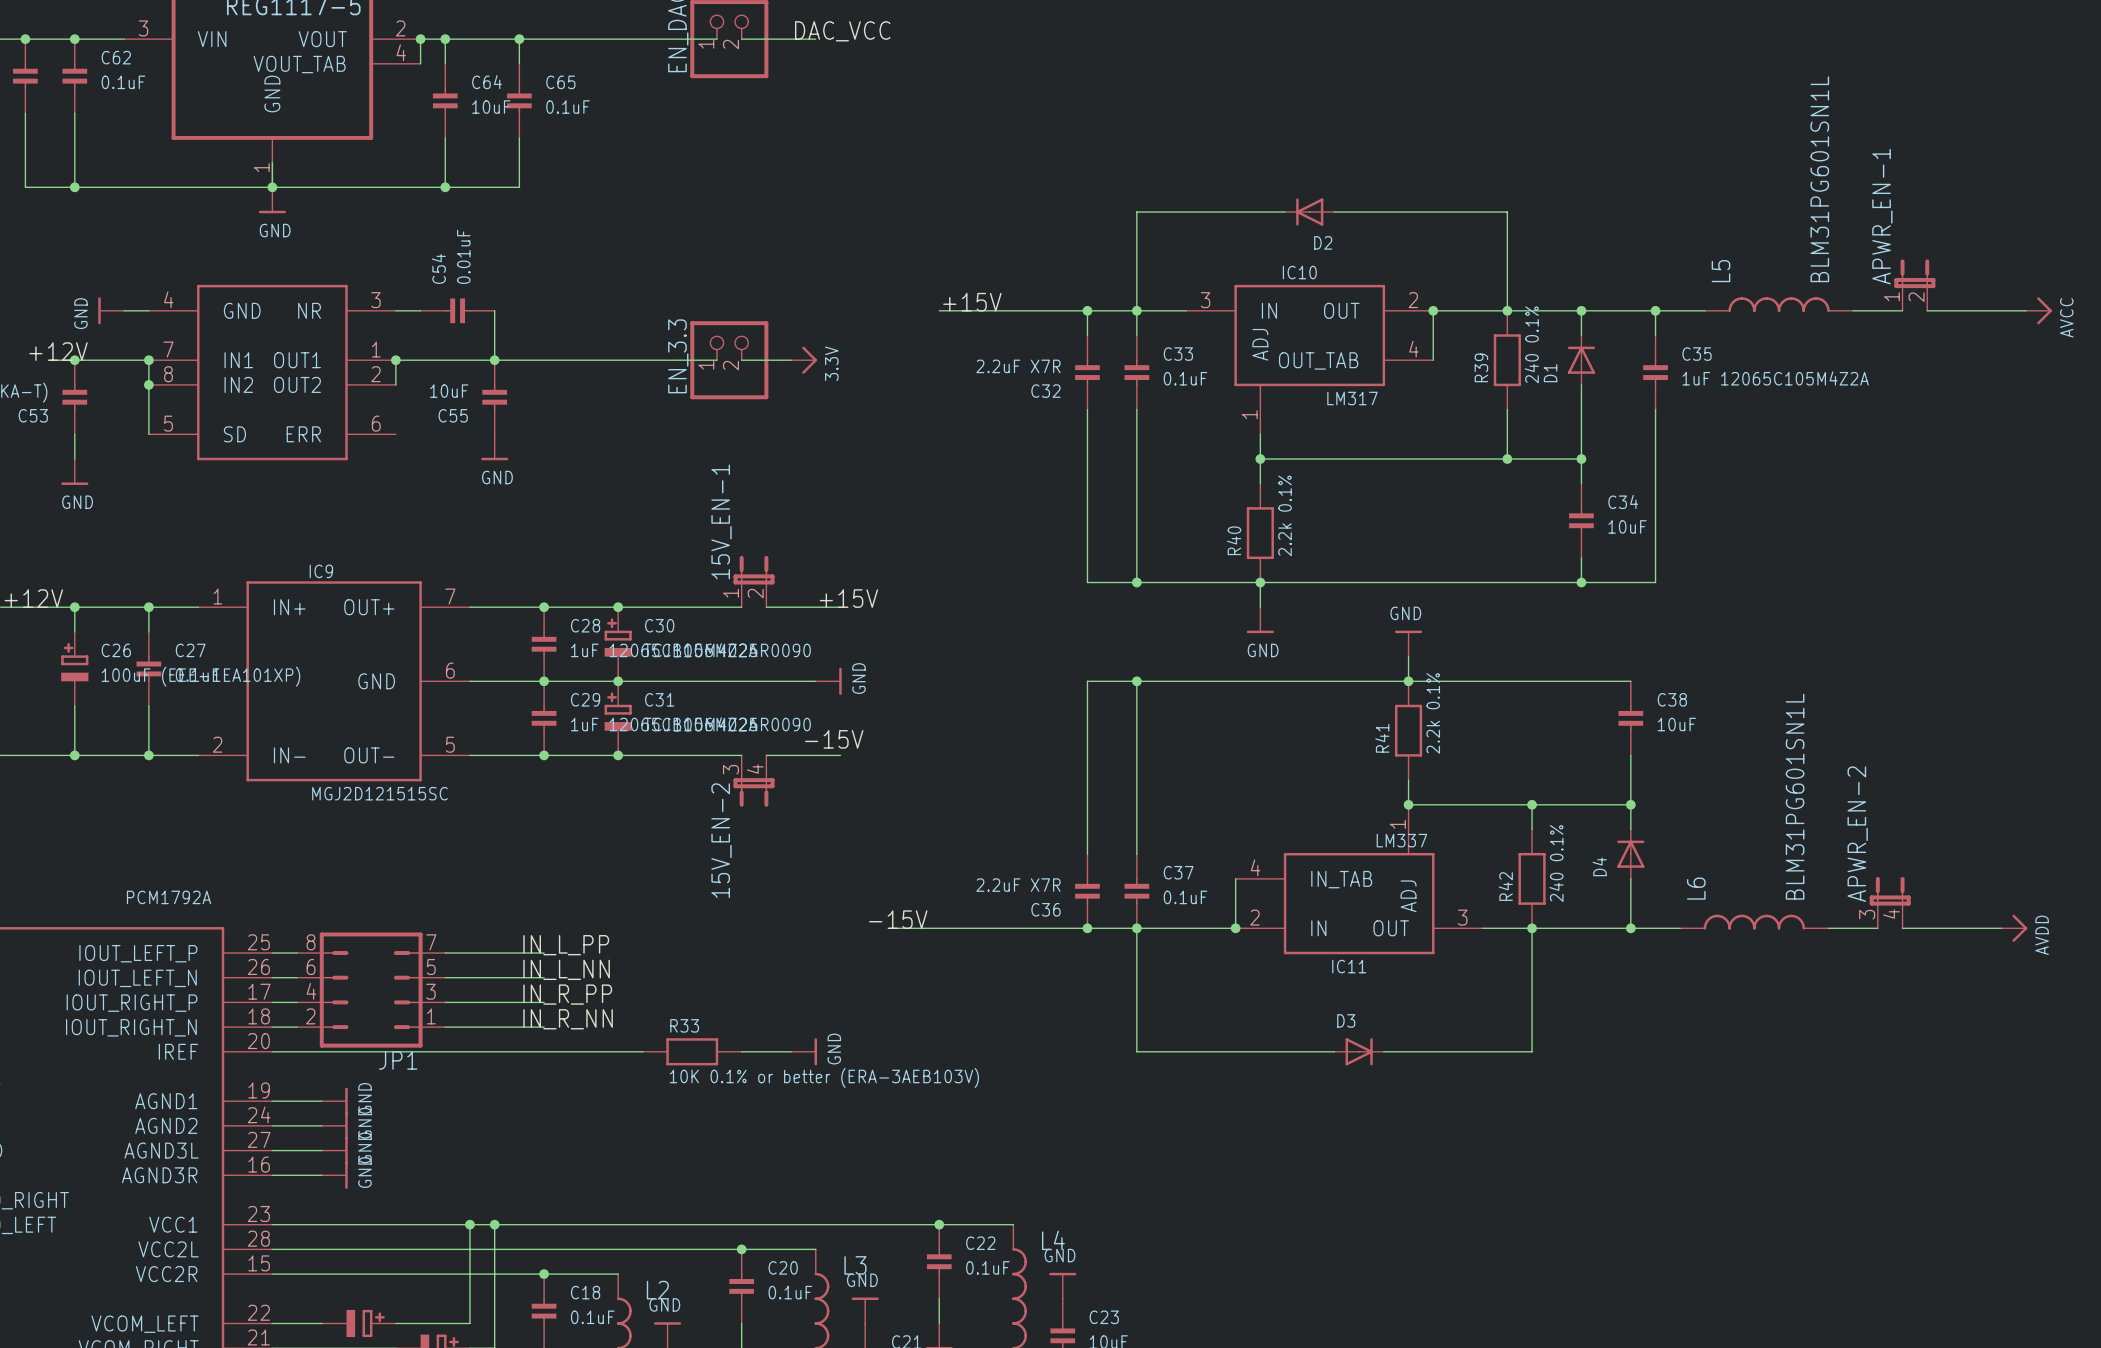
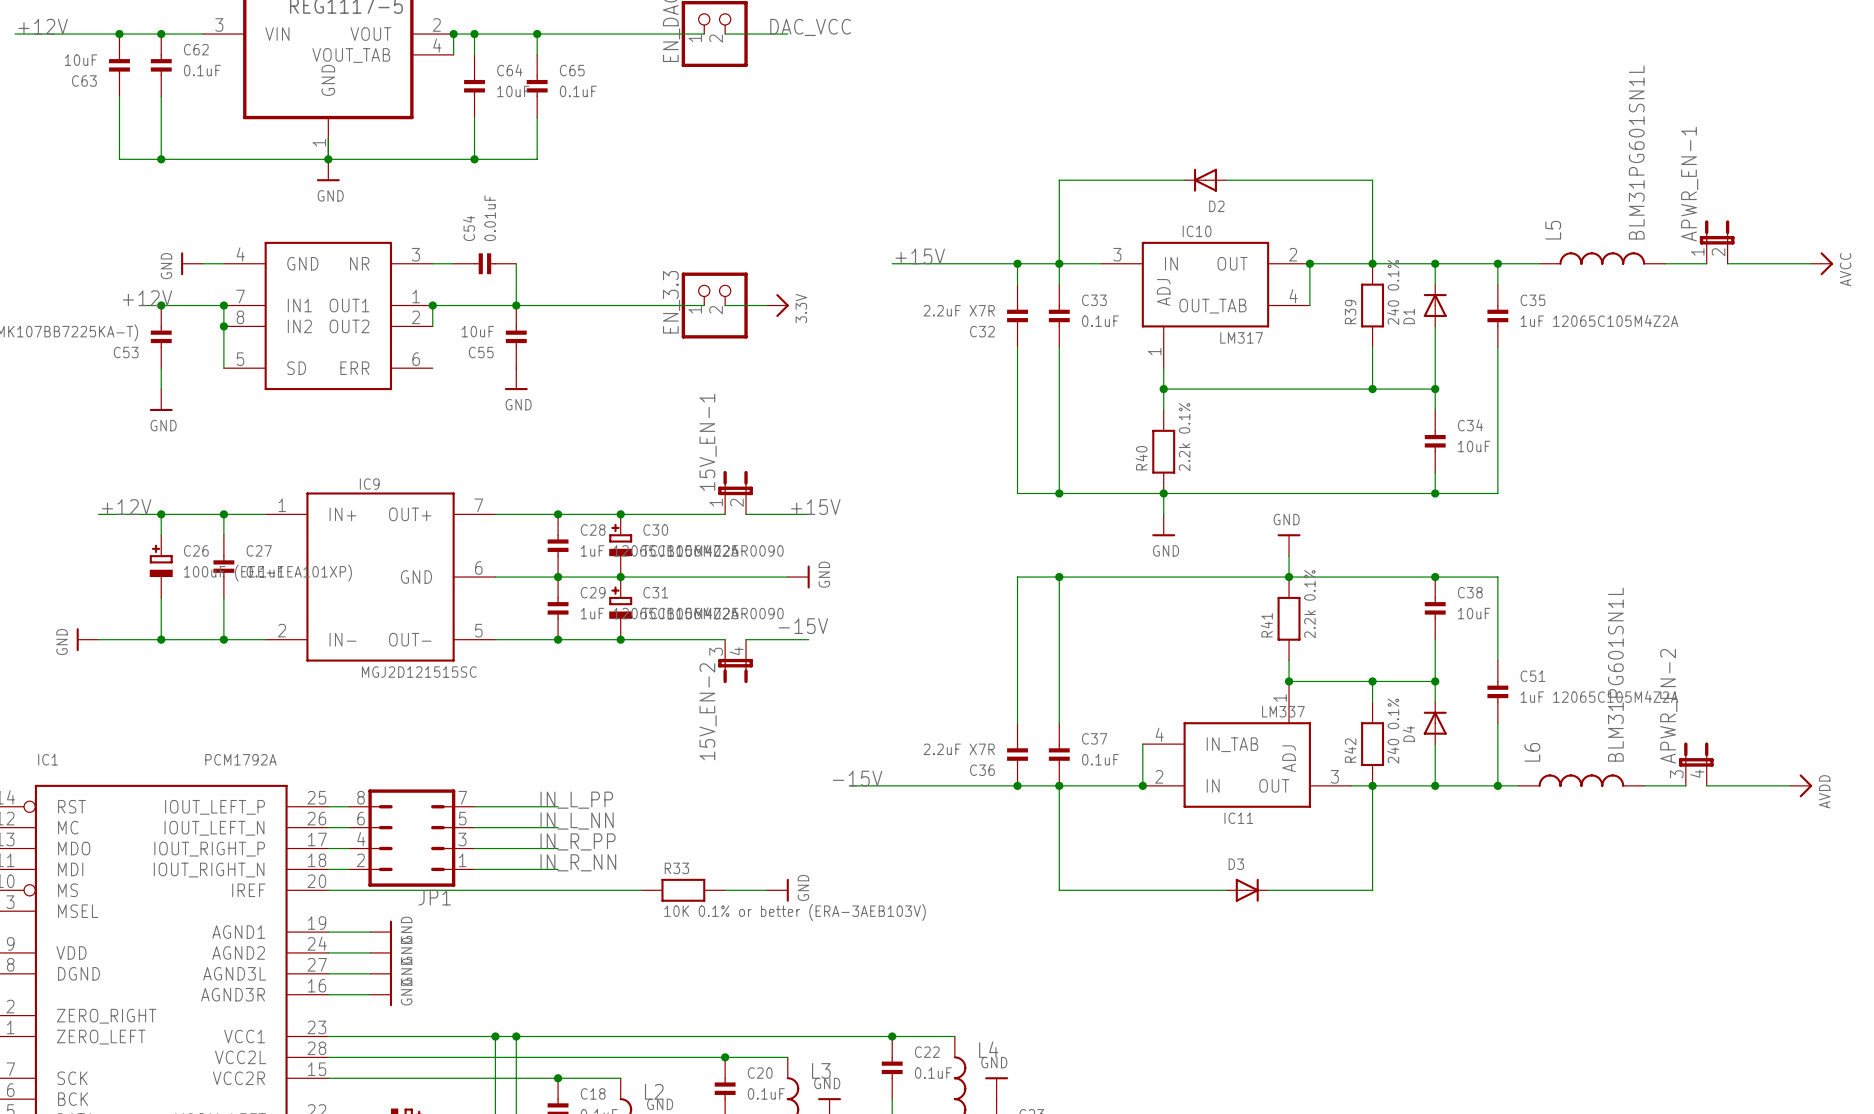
junction: none -> (1435, 577)
wire: none -> (1476, 577) (1497, 577) (1497, 660)
C38 position: (1630, 718) -> (1435, 608)
wire: (1630, 755) (1630, 829) -> (1435, 639) (1435, 702)
junction: none -> (1372, 681)
wire: (1532, 804) (1532, 829) -> (1372, 681) (1372, 702)
junction: (1532, 804) -> none
wire: (1581, 804) (1630, 804) -> none
junction: none -> (1435, 681)
junction: (1630, 804) -> none
C51: none -> 1uF 12065C105M4Z2A (1497, 691)
D4 position: (1630, 854) -> (1435, 723)
wire: none -> (1497, 723) (1497, 785)
R42 position: (1532, 878) -> (1372, 744)
wire: (1630, 878) (1630, 928) -> (1435, 744) (1435, 785)
junction: none -> (1372, 785)
wire: (1532, 928) (1532, 1051) (1507, 1051) -> (1372, 785) (1372, 890)
junction: (1532, 928) -> none
junction: none -> (1435, 785)
junction: (1630, 928) -> none
junction: none -> (1497, 785)

